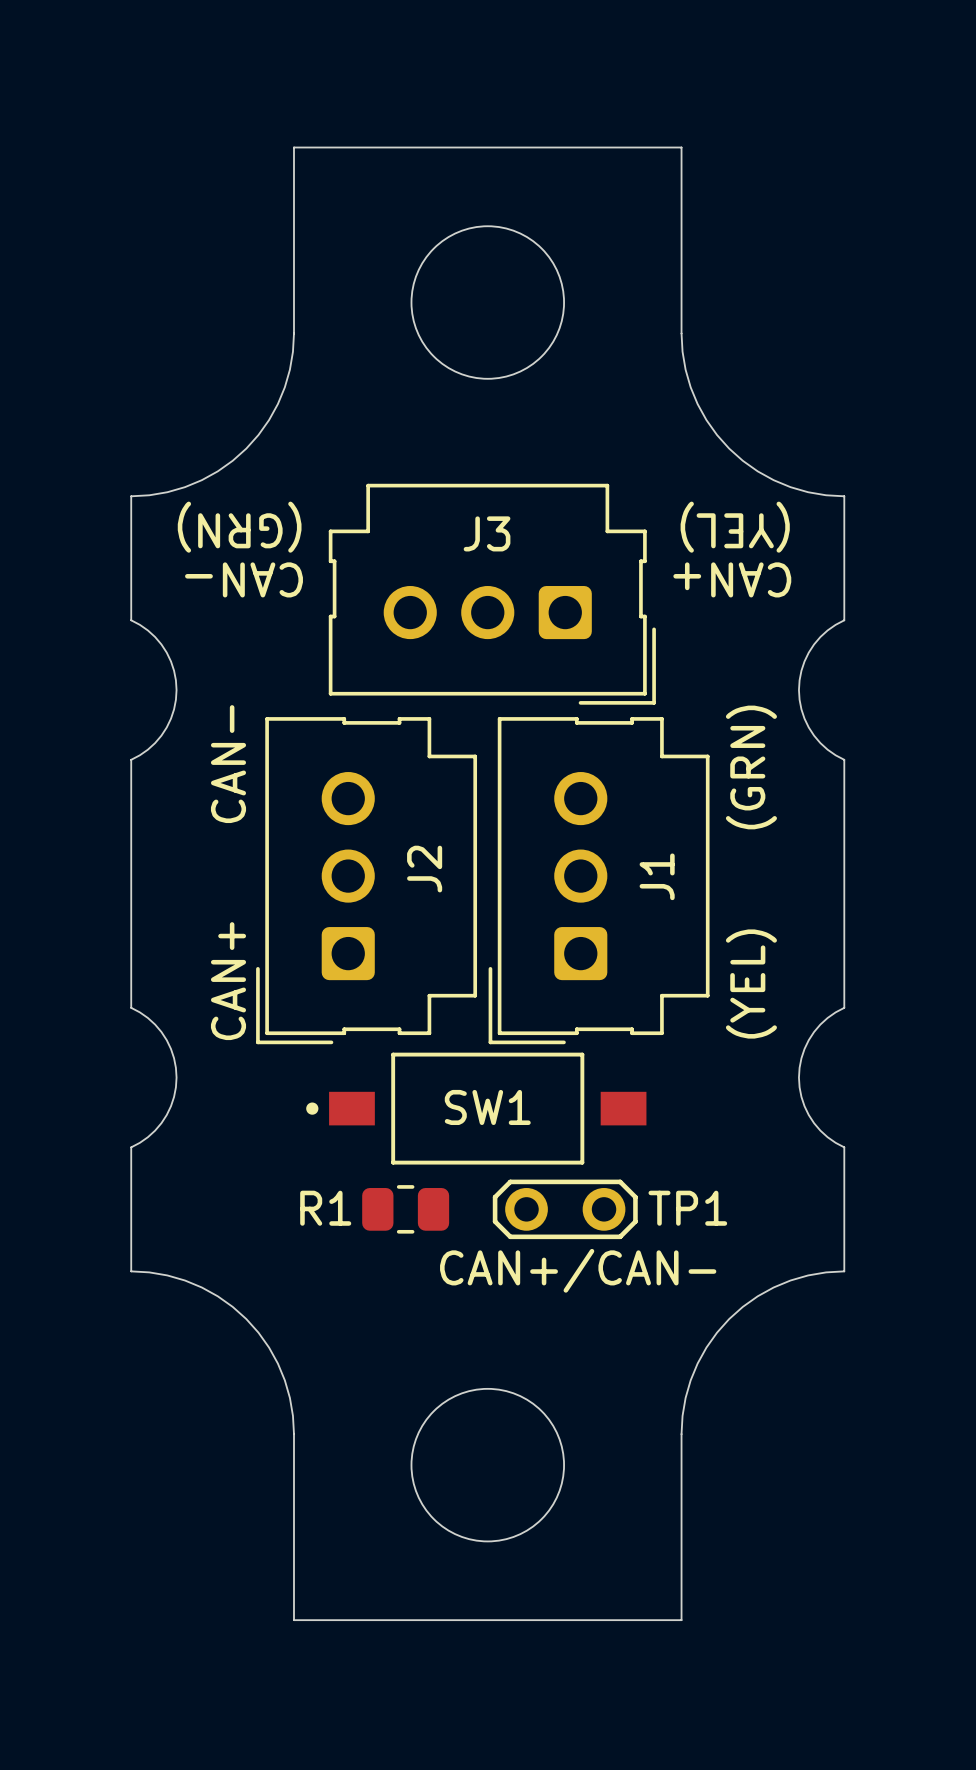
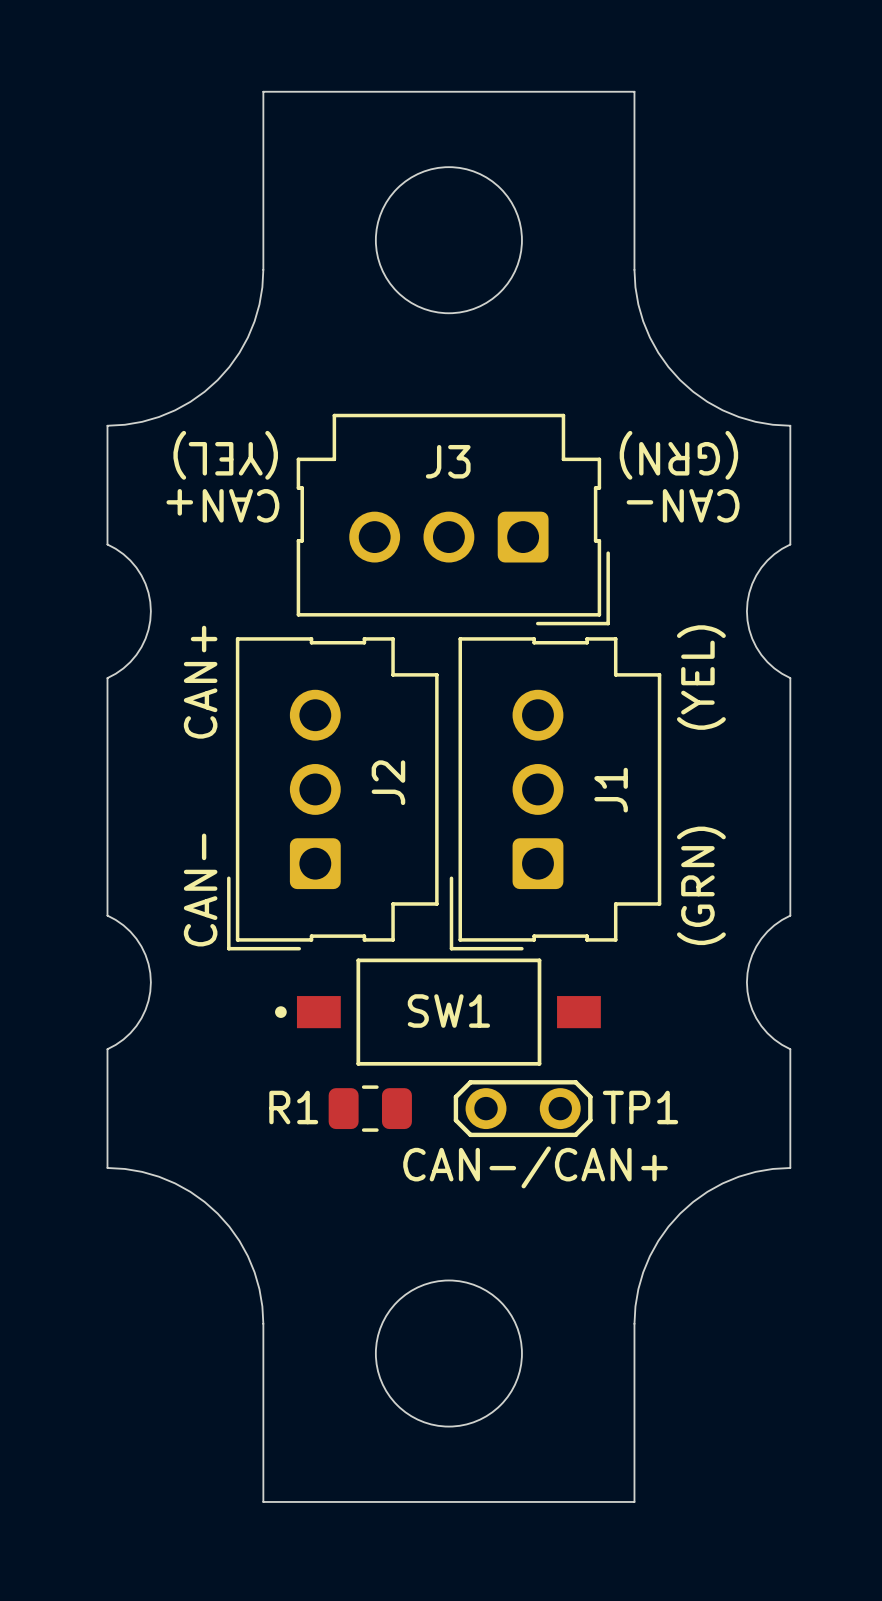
text: (GRN) (239, 527) -> (YEL) (225, 455)
text: (YEL) (735, 527) -> (GRN) (678, 455)
text: CAN- (244, 579) -> CAN+ (222, 505)
text: CAN+ (732, 579) -> CAN- (683, 505)
text: CAN- (228, 764) -> CAN+ (200, 682)
text: (GRN) (751, 767) -> (YEL) (701, 677)
text: CAN+ (228, 981) -> CAN- (200, 890)
text: (YEL) (751, 984) -> (GRN) (701, 885)
text: CAN+/CAN- (578, 1270) -> CAN-/CAN+ (535, 1167)

